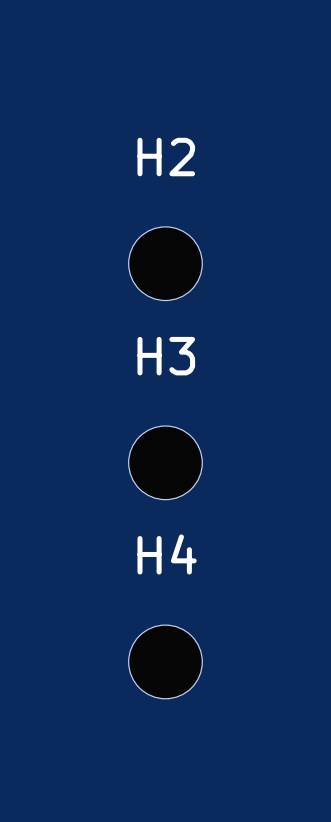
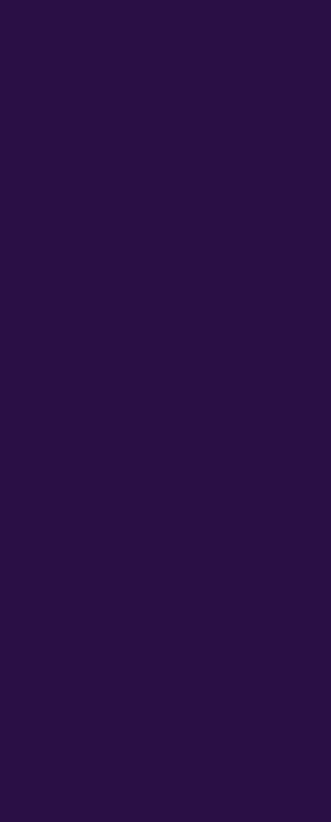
H2: (165, 263) -> none
H3: (165, 462) -> none
H4: (165, 661) -> none

